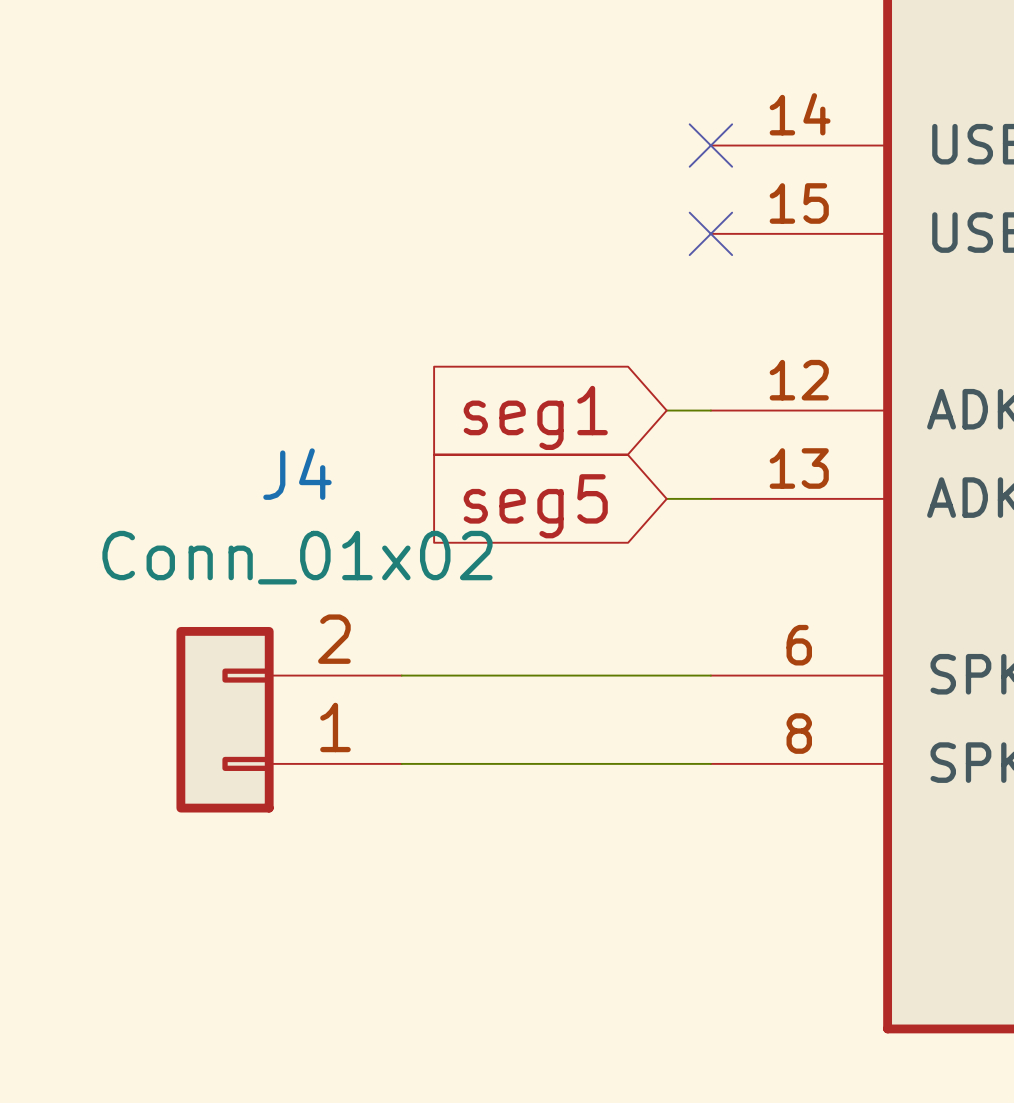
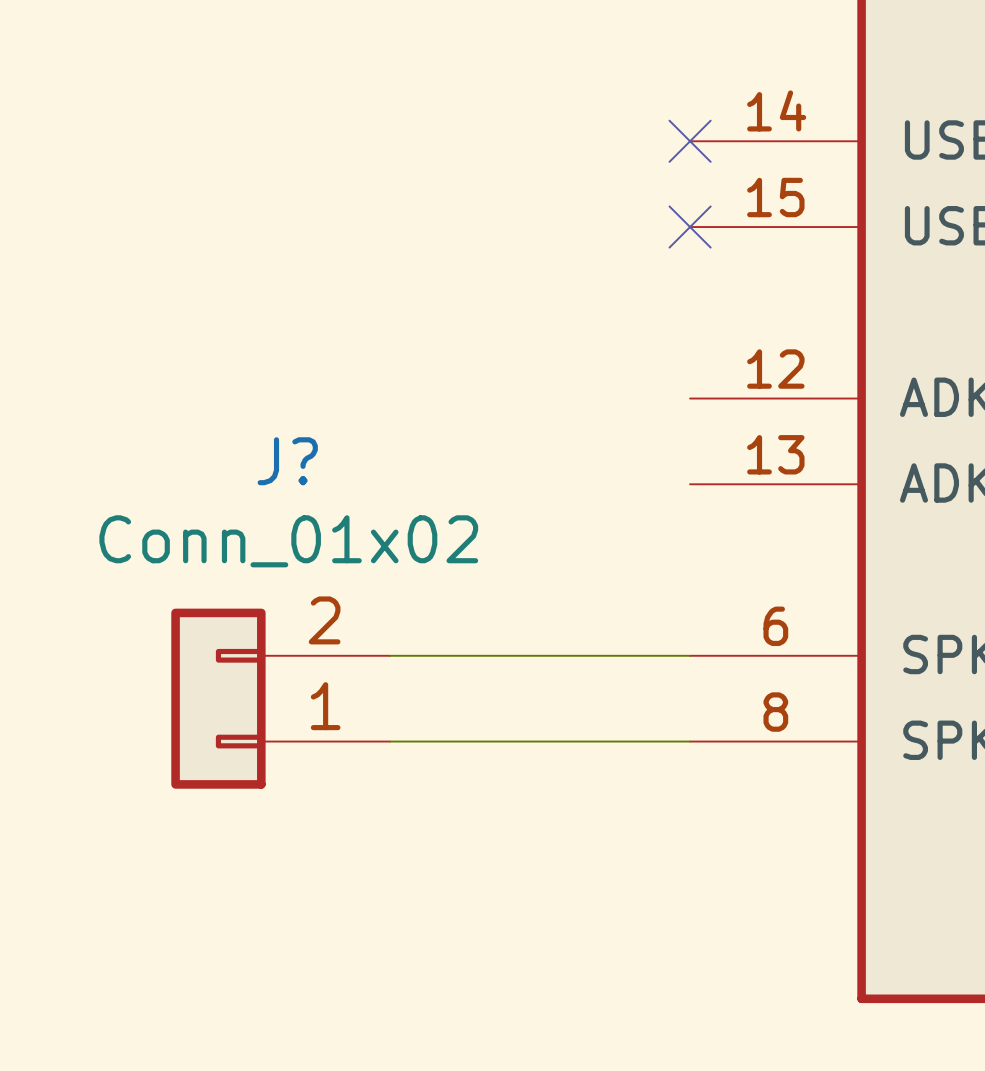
wire: (666, 410) (710, 410) -> none
global label: seg1 (535, 417) -> none
J4 name: J4 (297, 474) -> J? (287, 461)
wire: (666, 498) (710, 498) -> none
global label: seg5 (535, 506) -> none

